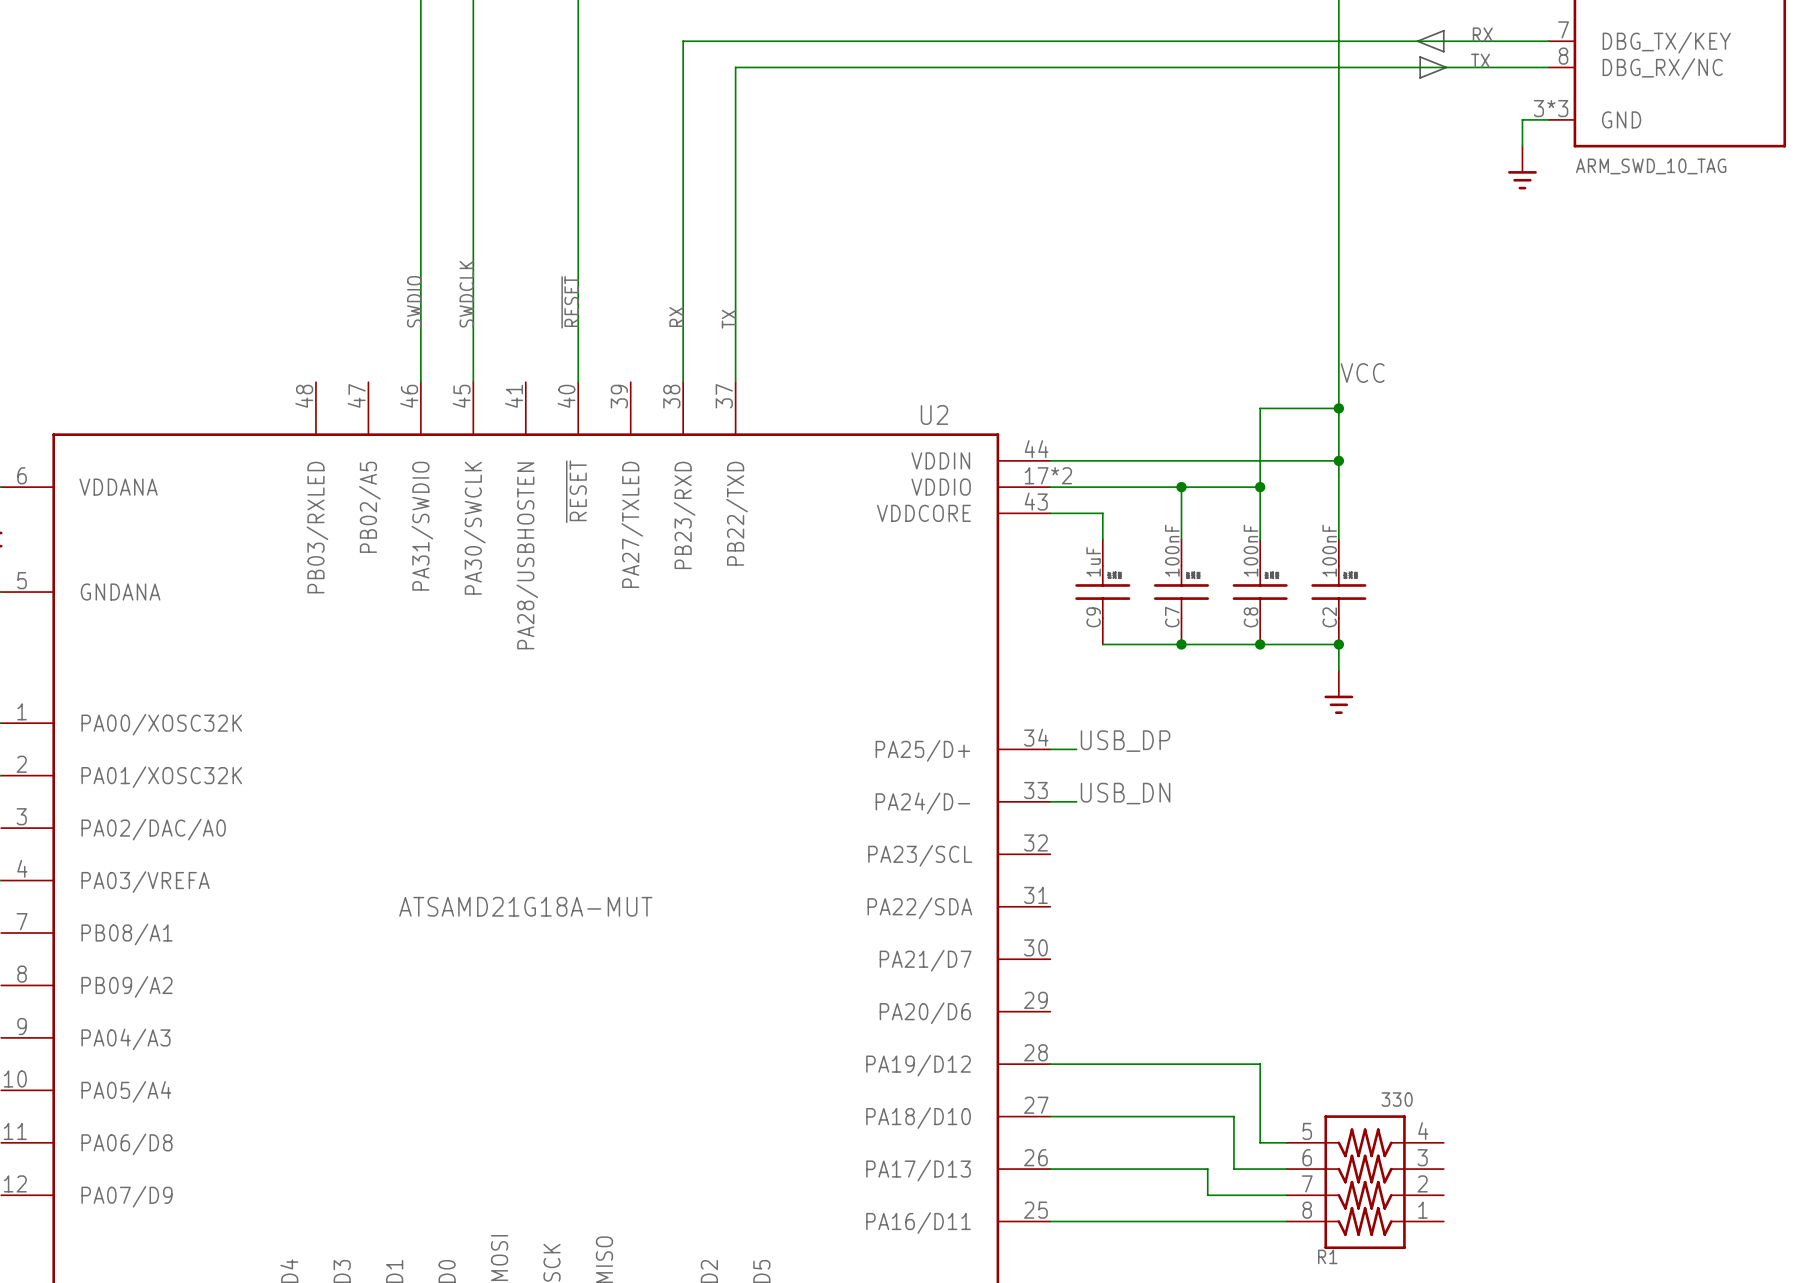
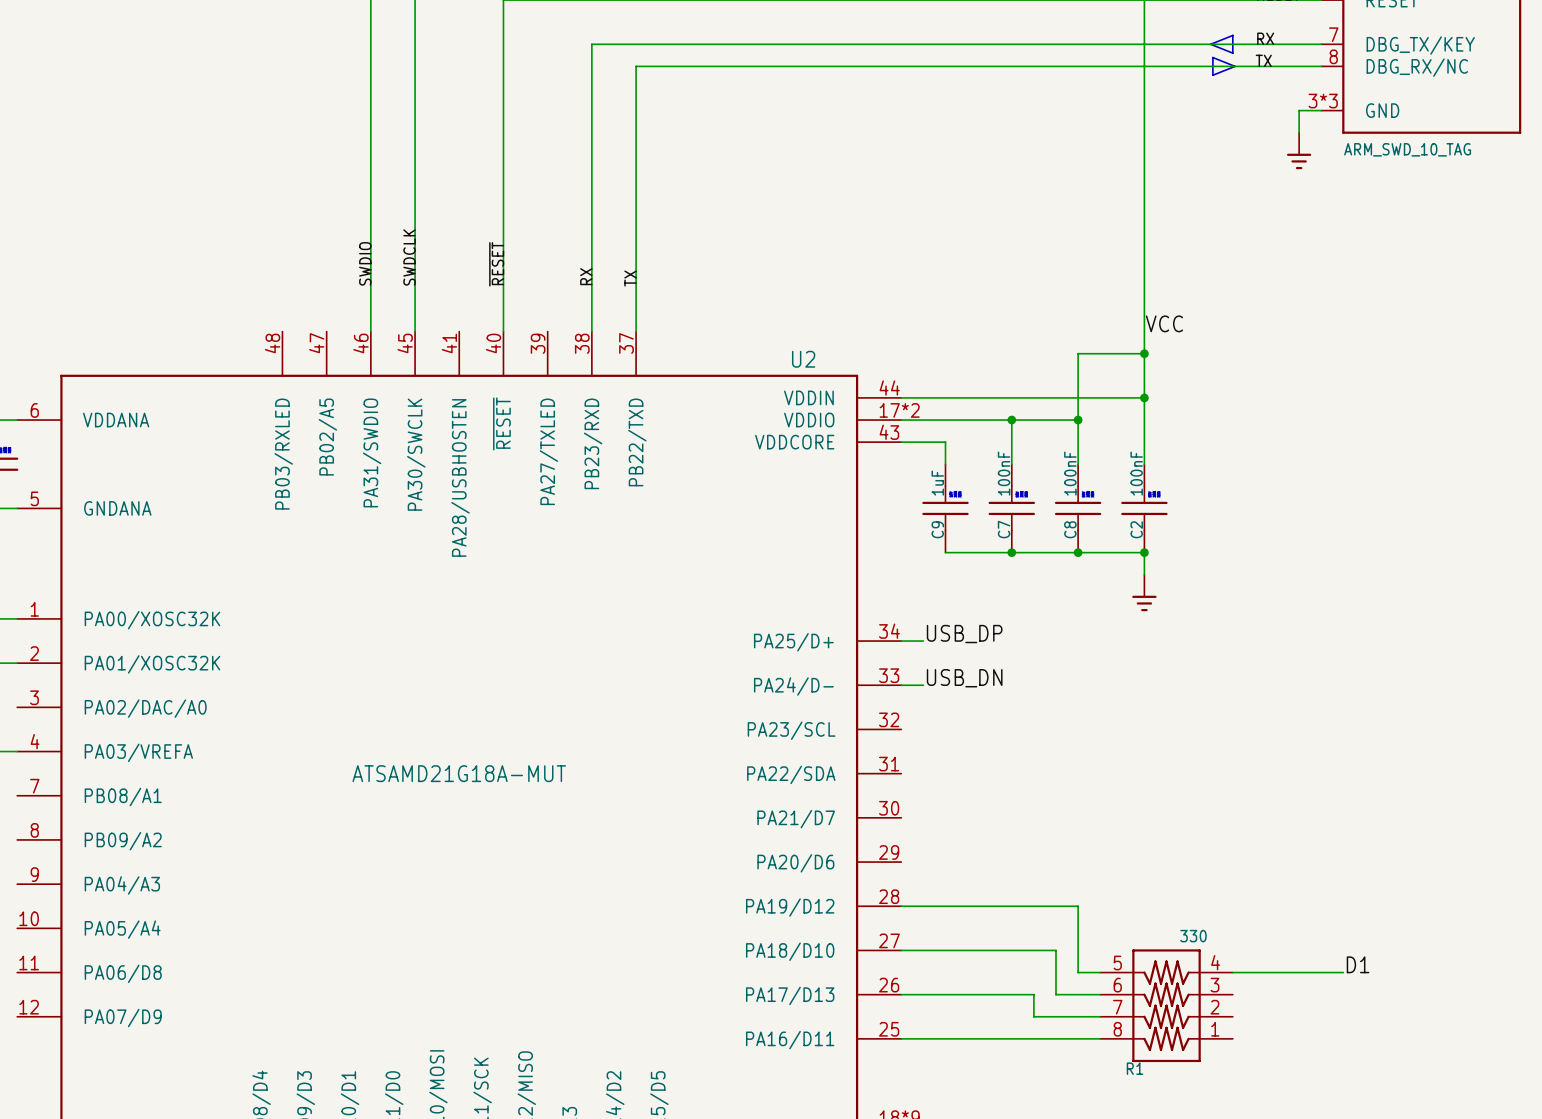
label: none -> D1 (1358, 964)
wire: none -> (1232, 972) (1343, 972)

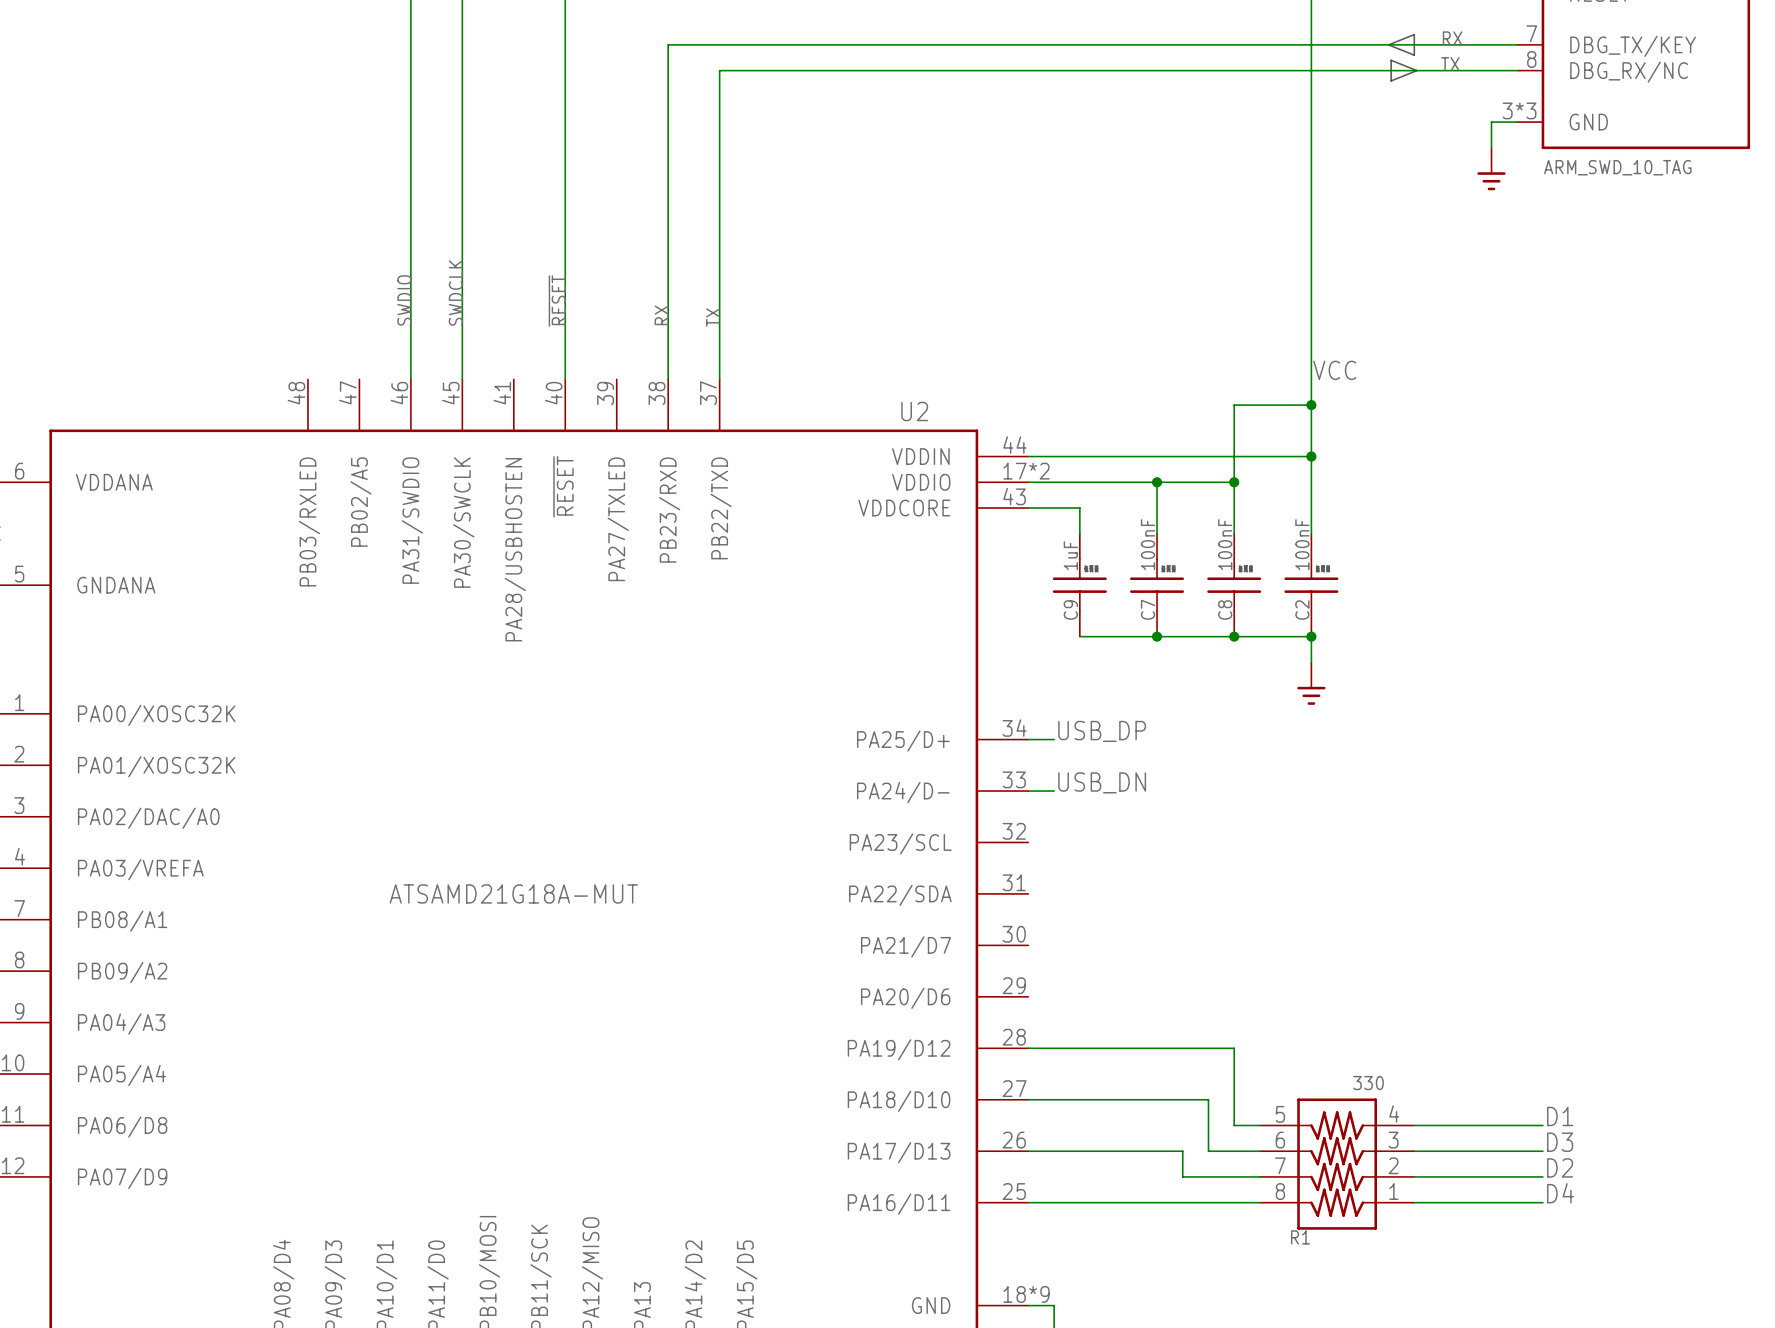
label: none -> D3 (1560, 1142)
wire: none -> (1414, 1151) (1542, 1151)
label: none -> D2 (1560, 1167)
wire: none -> (1414, 1176) (1542, 1176)
label: none -> D4 (1560, 1193)
wire: none -> (1414, 1202) (1542, 1202)

